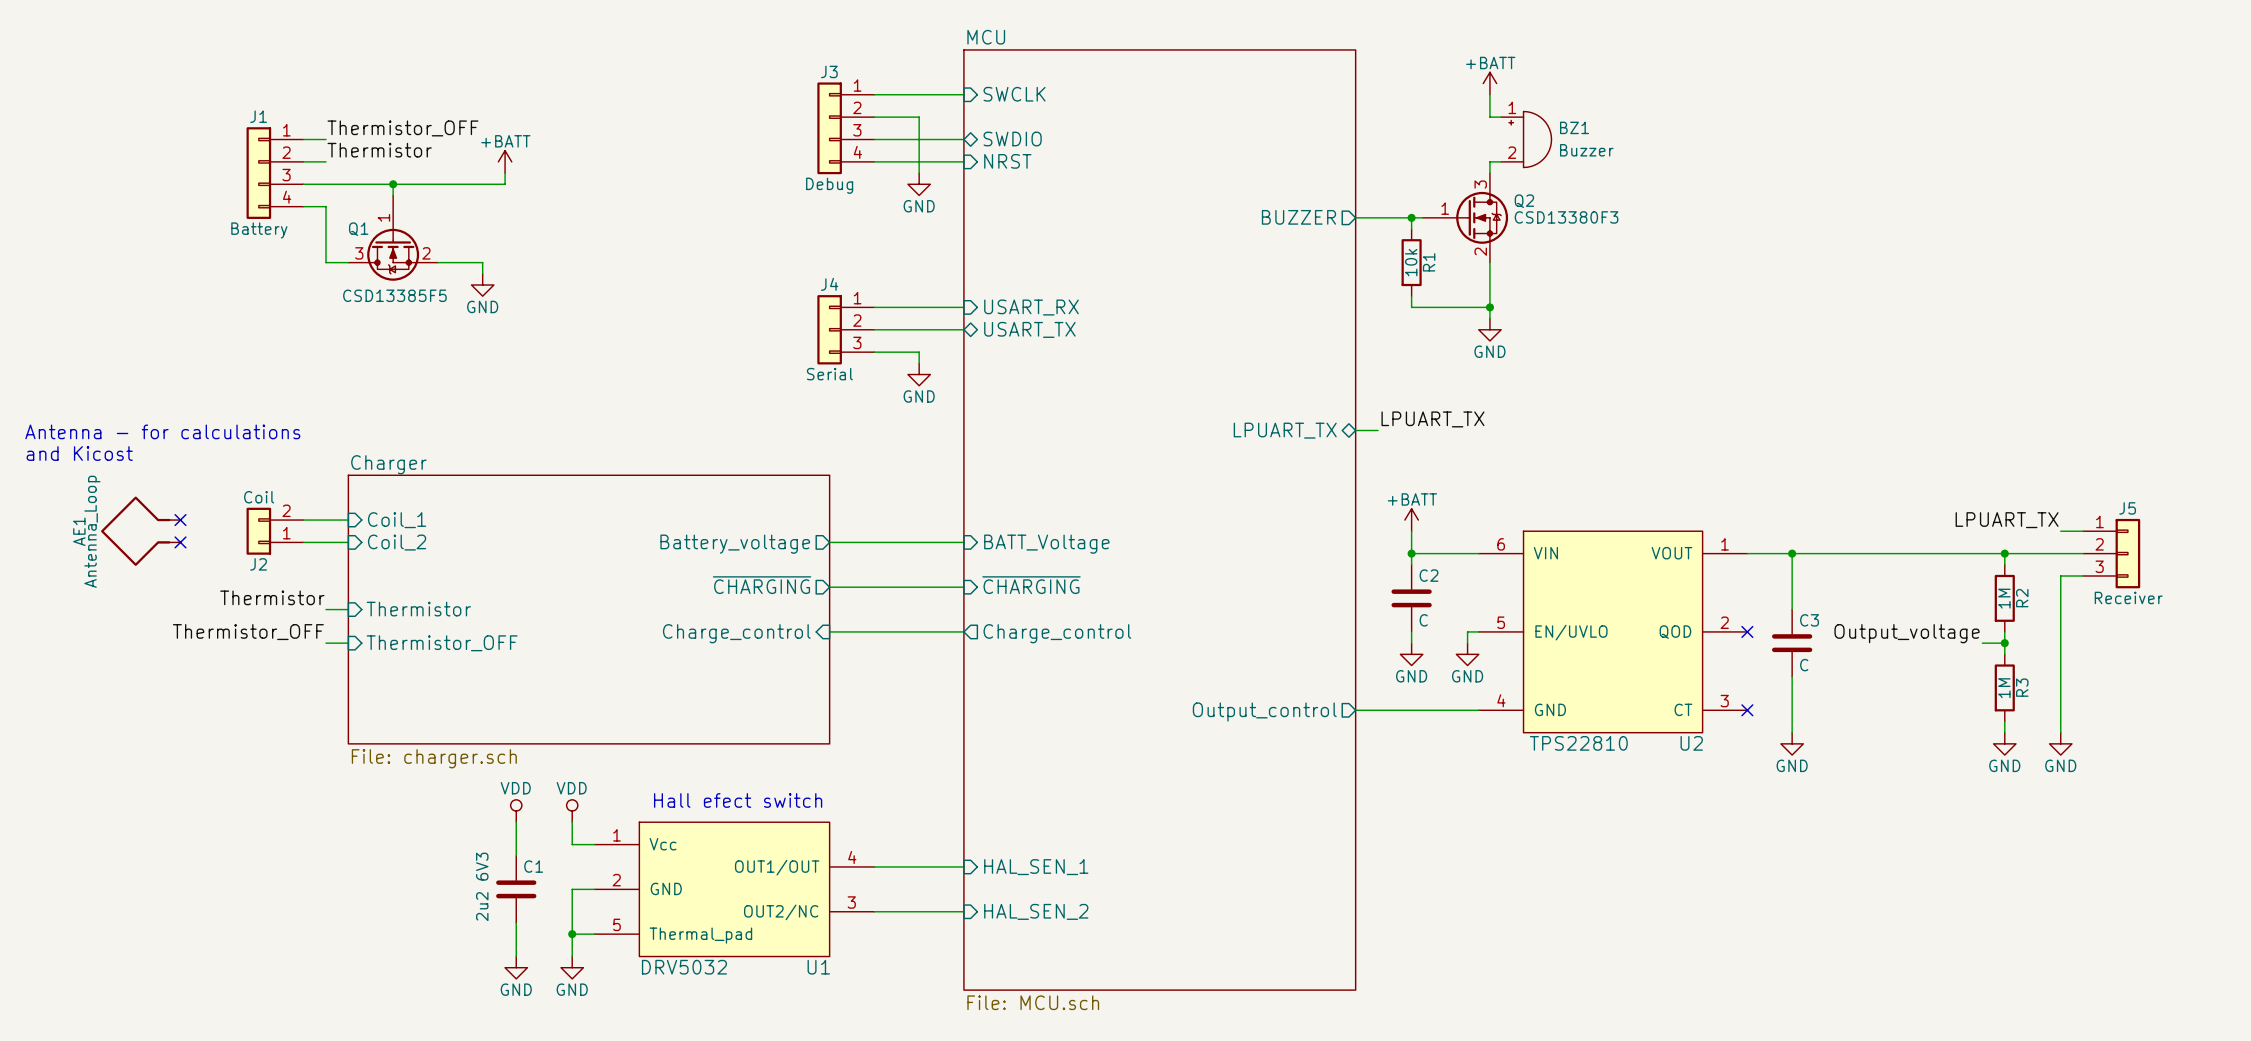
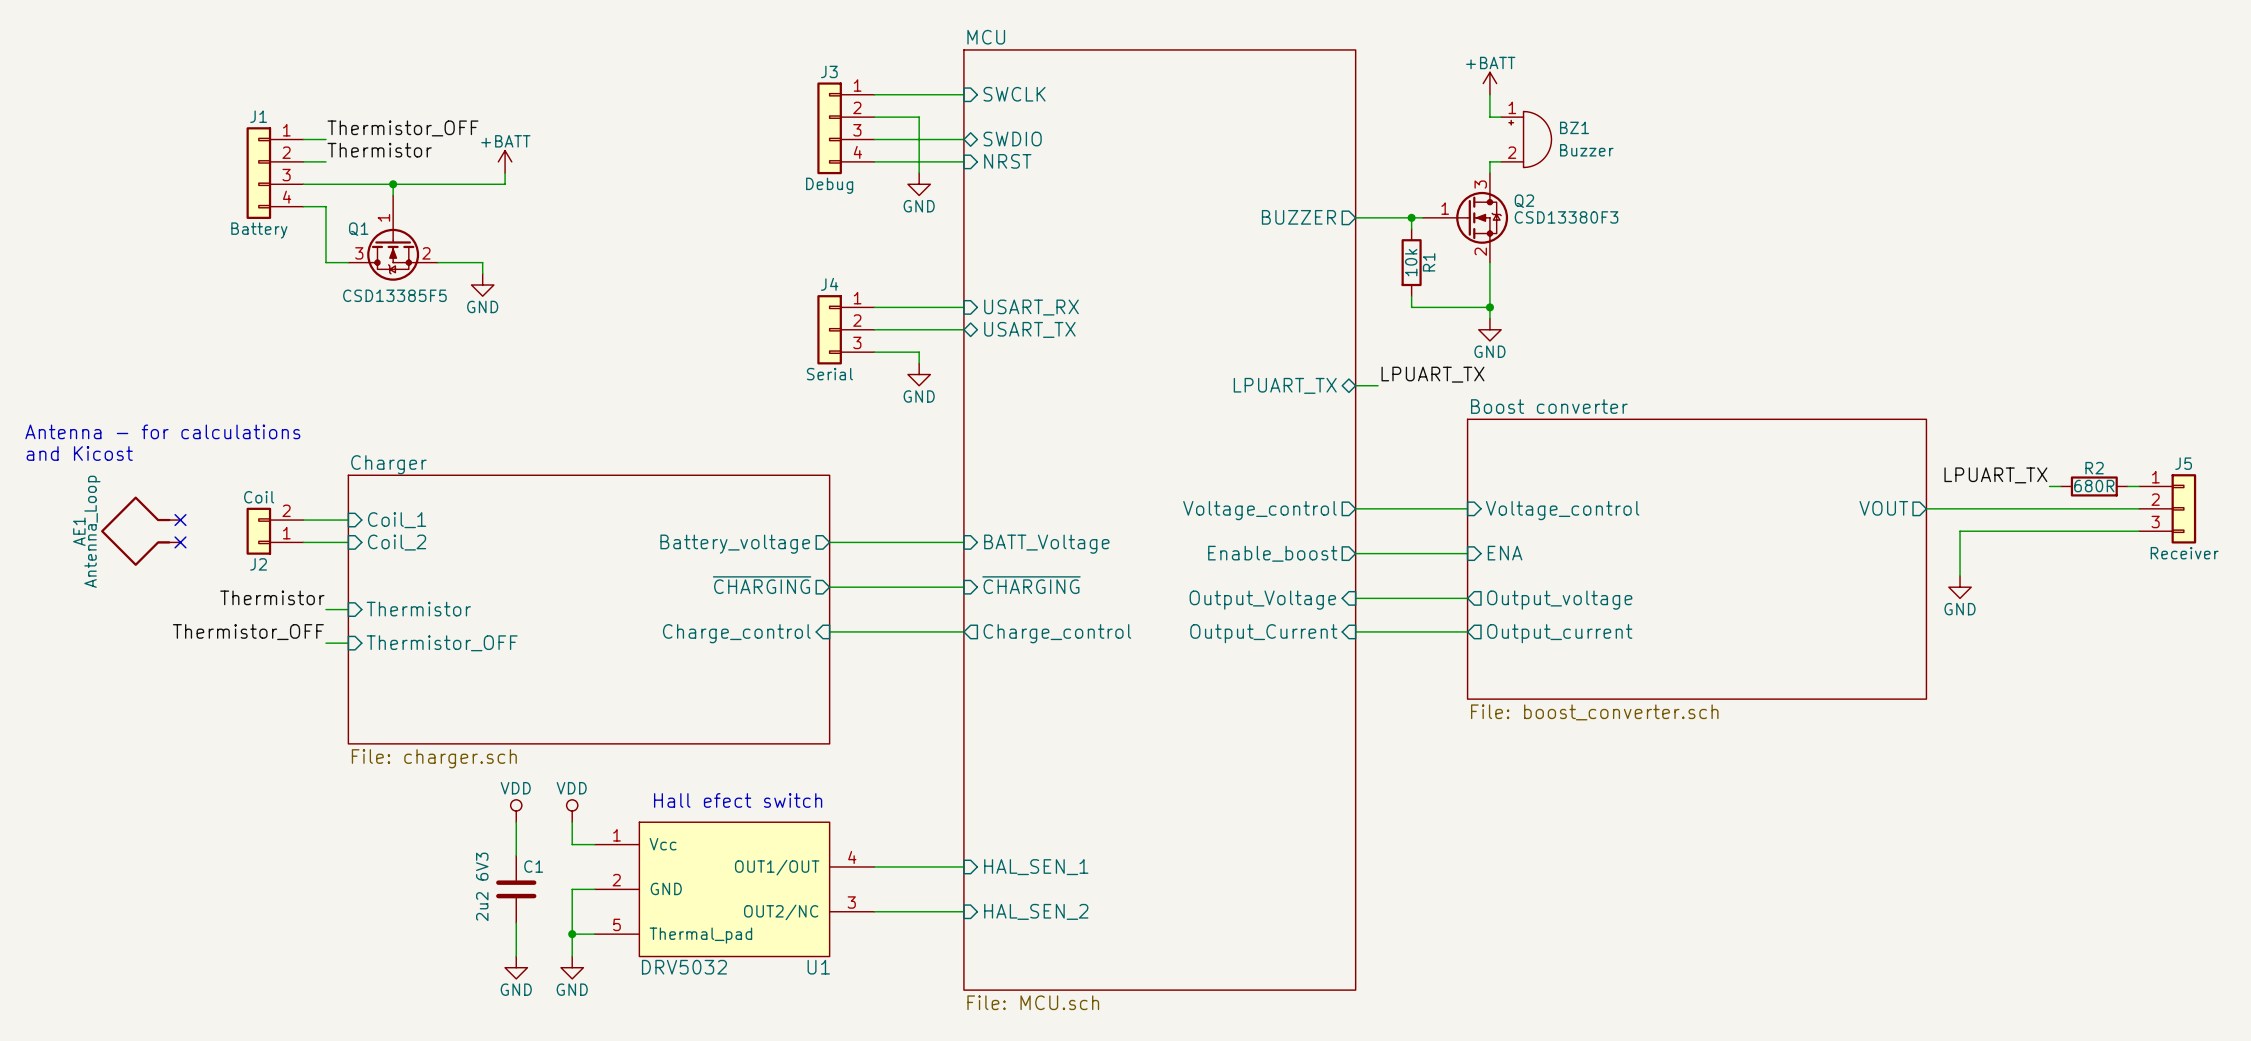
label position: LPUART_TX (1432, 419) -> LPUART_TX (1432, 374)
sheet pin position: LPUART_TX (1285, 430) -> LPUART_TX (1285, 385)
wire: (1355, 430) (1378, 430) -> (1355, 385) (1378, 385)
wire: none -> (2049, 486) (2060, 486)
wire: none -> (2127, 486) (2139, 486)
wire: none -> (1355, 508) (1467, 508)
sheet pin: none -> VOUT (1883, 508)
wire: none -> (1926, 508) (2139, 508)
sheet pin: none -> Voltage_control (1259, 510)
sheet pin: none -> Voltage_control (1562, 510)
power symbol: +BATT (1411, 520) -> none
label position: LPUART_TX (2007, 520) -> LPUART_TX (1995, 475)
wire: (1411, 531) (1411, 564) -> none
wire: none -> (2060, 531) (1960, 531) (1960, 575)
sheet pin: none -> Enable_boost (1272, 553)
wire: none -> (1355, 553) (1411, 553)
junction: (1411, 553) -> none
wire: (1467, 553) (1478, 553) -> none
sheet pin: none -> ENA (1505, 553)
wire: (1747, 553) (2083, 553) -> none
wire: (1792, 553) (1792, 609) -> none
junction: (1792, 553) -> none
wire: (2004, 553) (2004, 564) -> none
junction: (2004, 553) -> none
J5 position: (2111, 553) -> (2167, 508)
sheet Boost converter: none -> File: boost_converter.sch (1697, 559)
wire: (2083, 575) (2060, 575) (2060, 732) -> none
power symbol: none -> GND (1960, 587)
wire: none -> (1355, 598) (1467, 598)
C2: C (1411, 598) -> none
R2 rotation: 0° (2004, 598) -> 90° clockwise (2094, 486)
R2 position: (2004, 598) -> (2094, 486)
R2 value: 1M (2004, 598) -> 680R (2094, 486)
R2 name position: R2 (2022, 598) -> R2 (2094, 468)
sheet pin: none -> Output_Voltage (1262, 600)
sheet pin: none -> Output_voltage (1559, 600)
wire: none -> (1355, 631) (1467, 631)
wire: (1411, 631) (1411, 643) -> none
U2: TPS22810 (1613, 631) -> none
no-connect mark: (1747, 631) -> none
wire: (2004, 631) (2004, 654) -> none
sheet pin: none -> Output_Current (1263, 633)
sheet pin: none -> Output_current (1559, 633)
label: Output_voltage (1907, 633) -> none
C3: C (1792, 643) -> none
wire: (1982, 643) (2004, 643) -> none
junction: (2004, 643) -> none
power symbol: GND (1411, 654) -> none
power symbol: GND (1467, 654) -> none
wire: (1792, 676) (1792, 732) -> none
R3: 1M (2004, 687) -> none
wire: (1355, 710) (1478, 710) -> none
no-connect mark: (1747, 710) -> none
sheet pin: Output_control (1264, 712) -> none
wire: (2004, 721) (2004, 732) -> none
power symbol: GND (1792, 743) -> none
power symbol: GND (2004, 743) -> none
power symbol: GND (2060, 743) -> none

